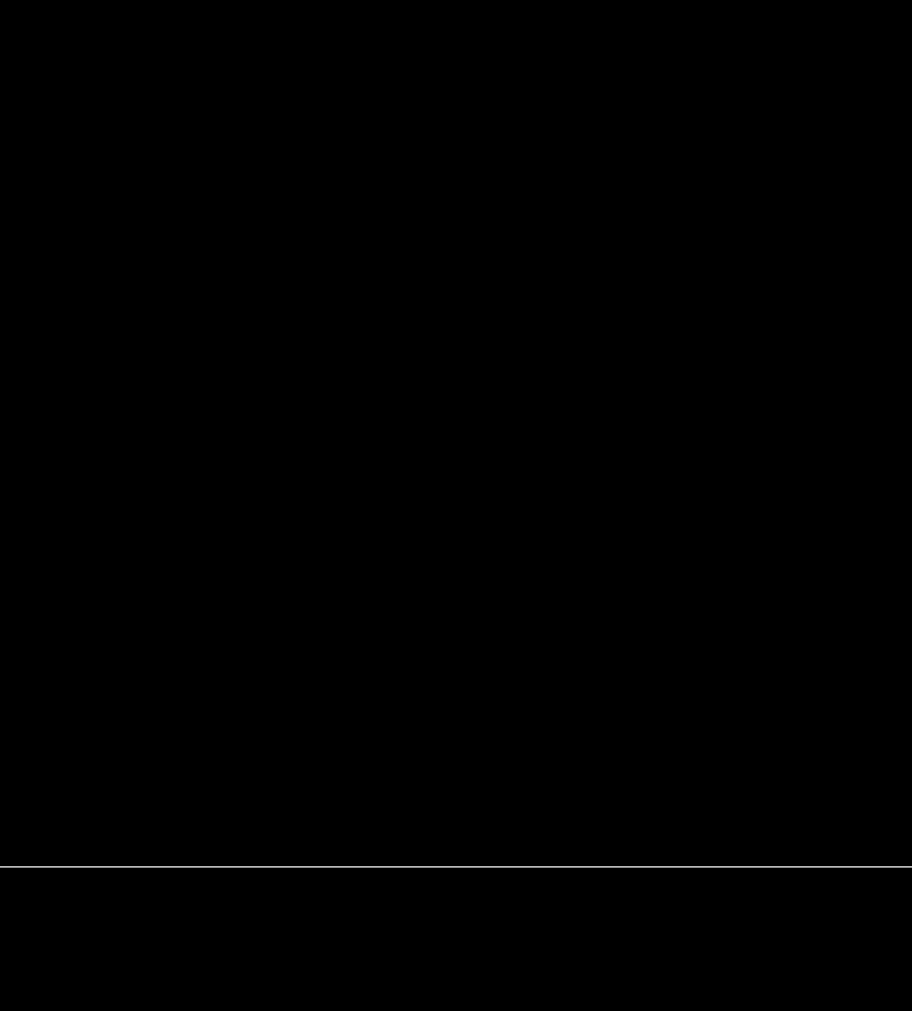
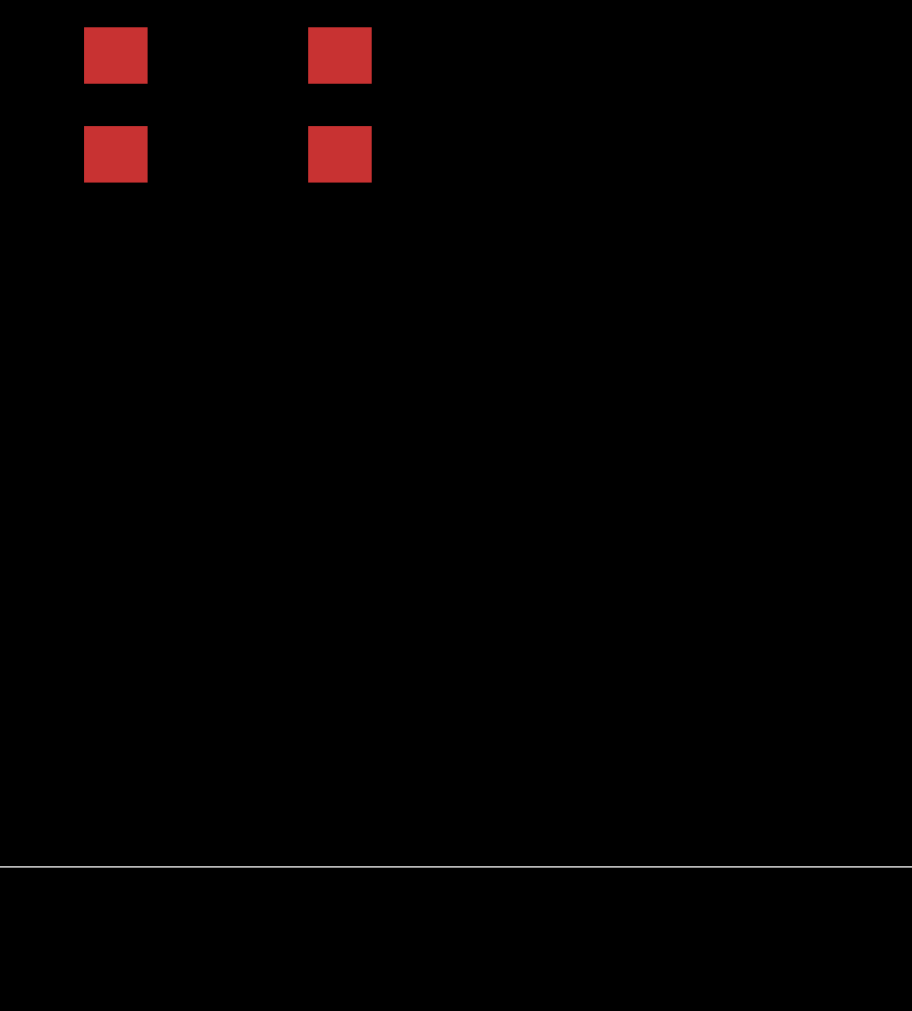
part: none -> (115, 104)
part: none -> (339, 104)

